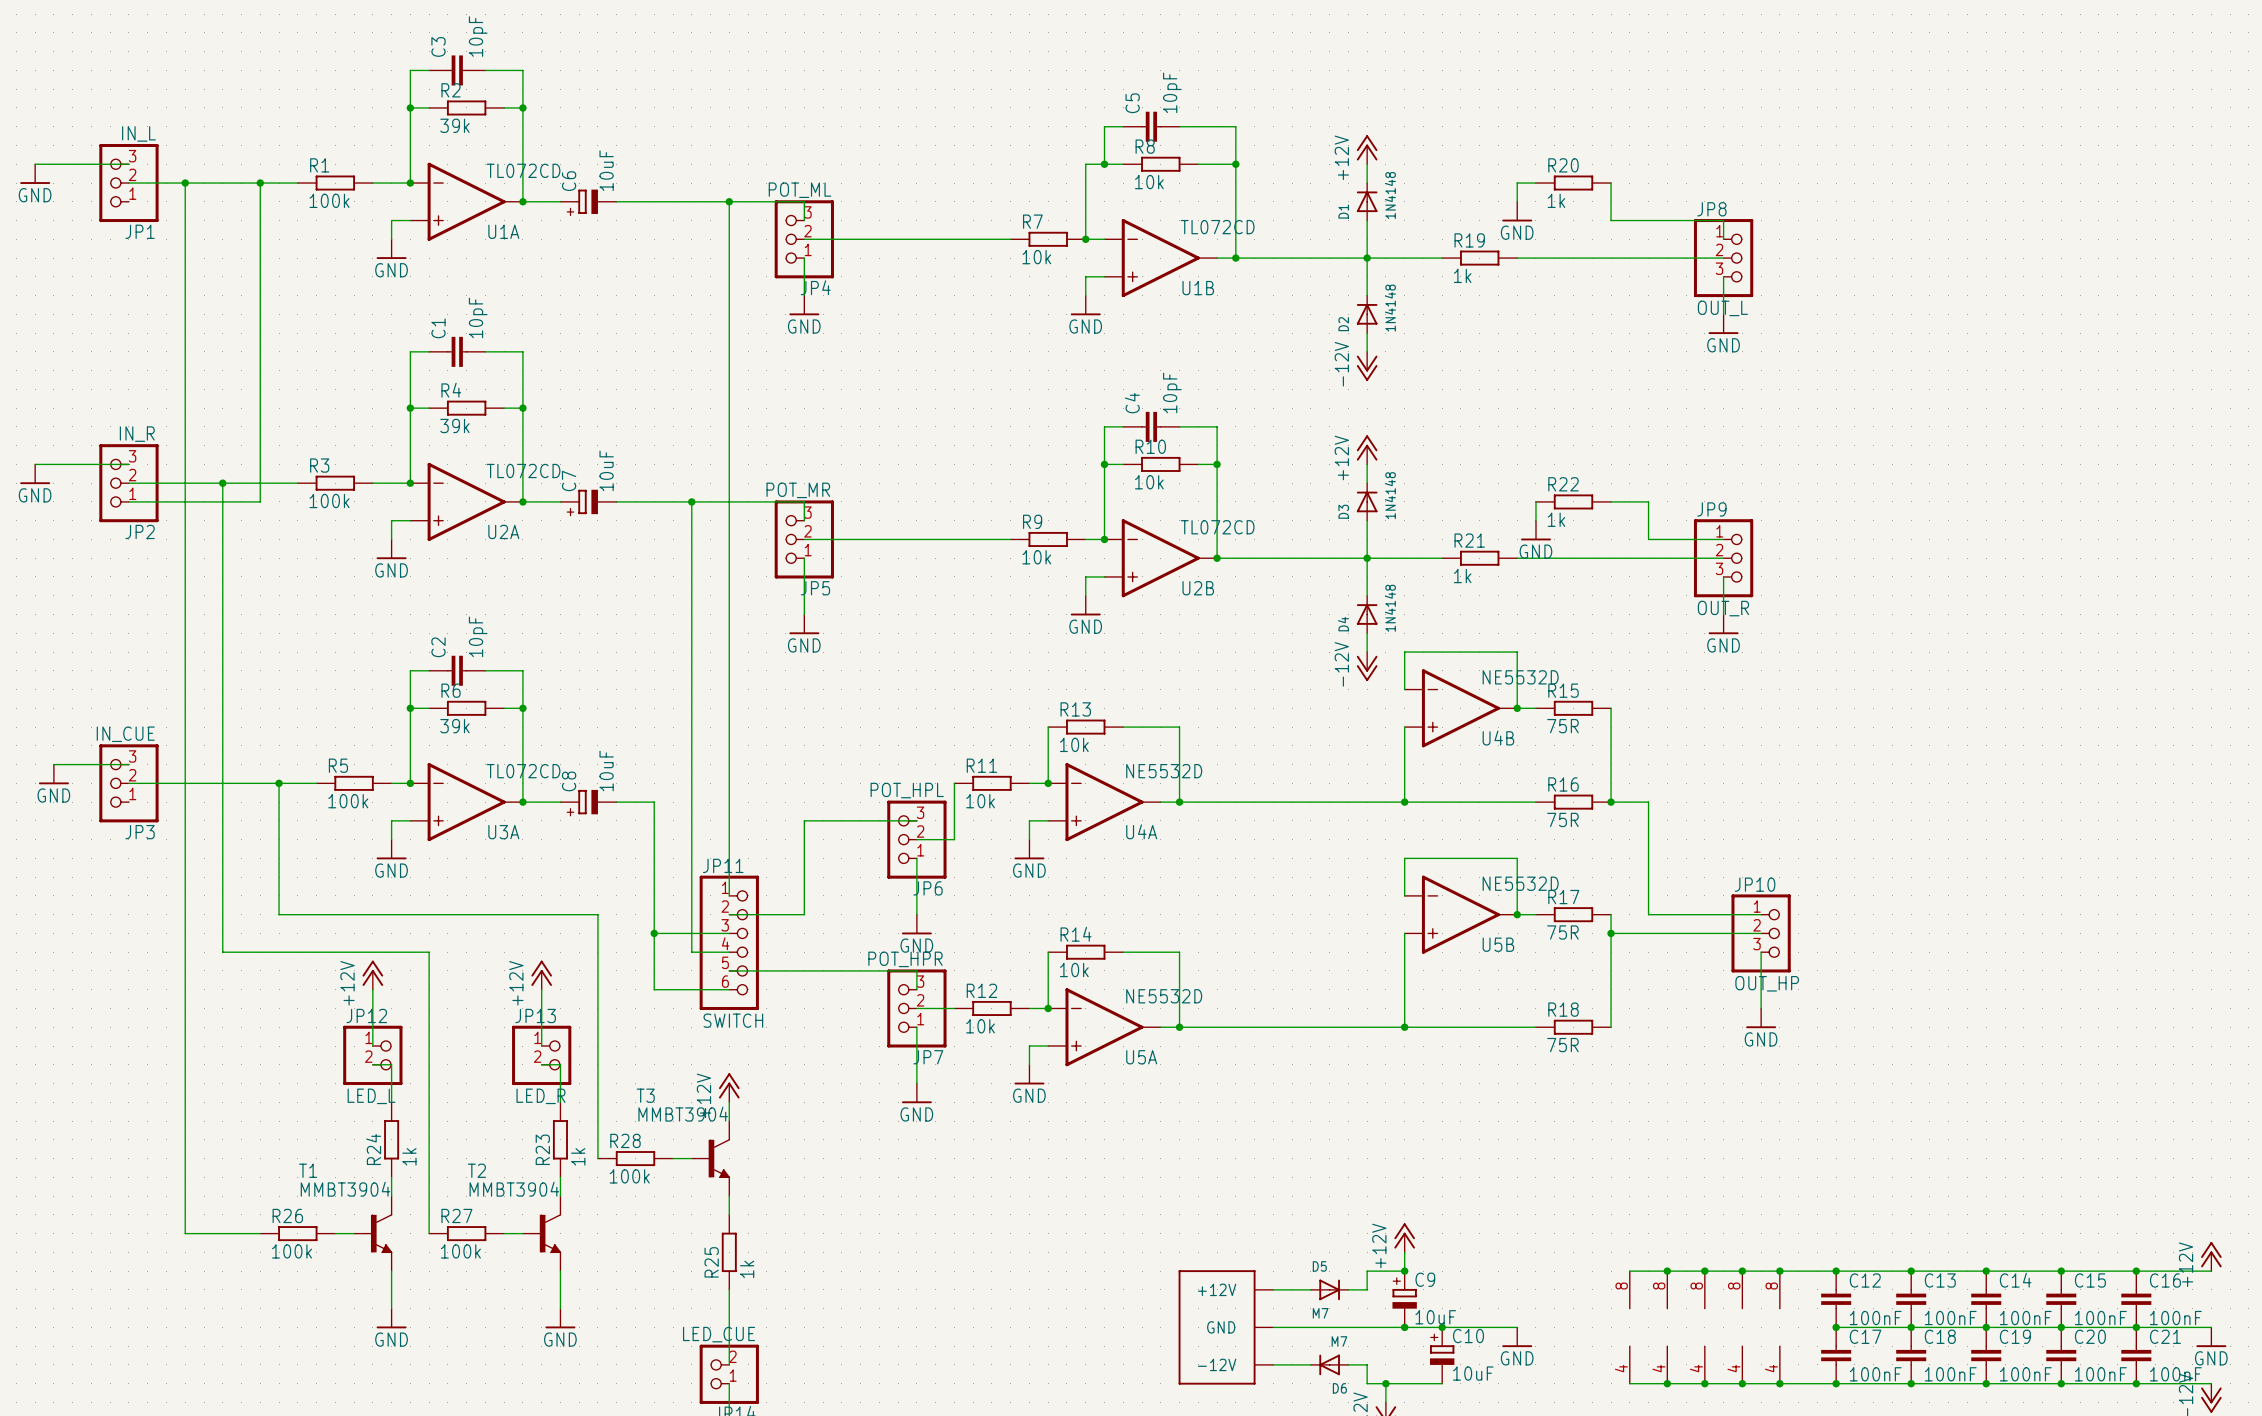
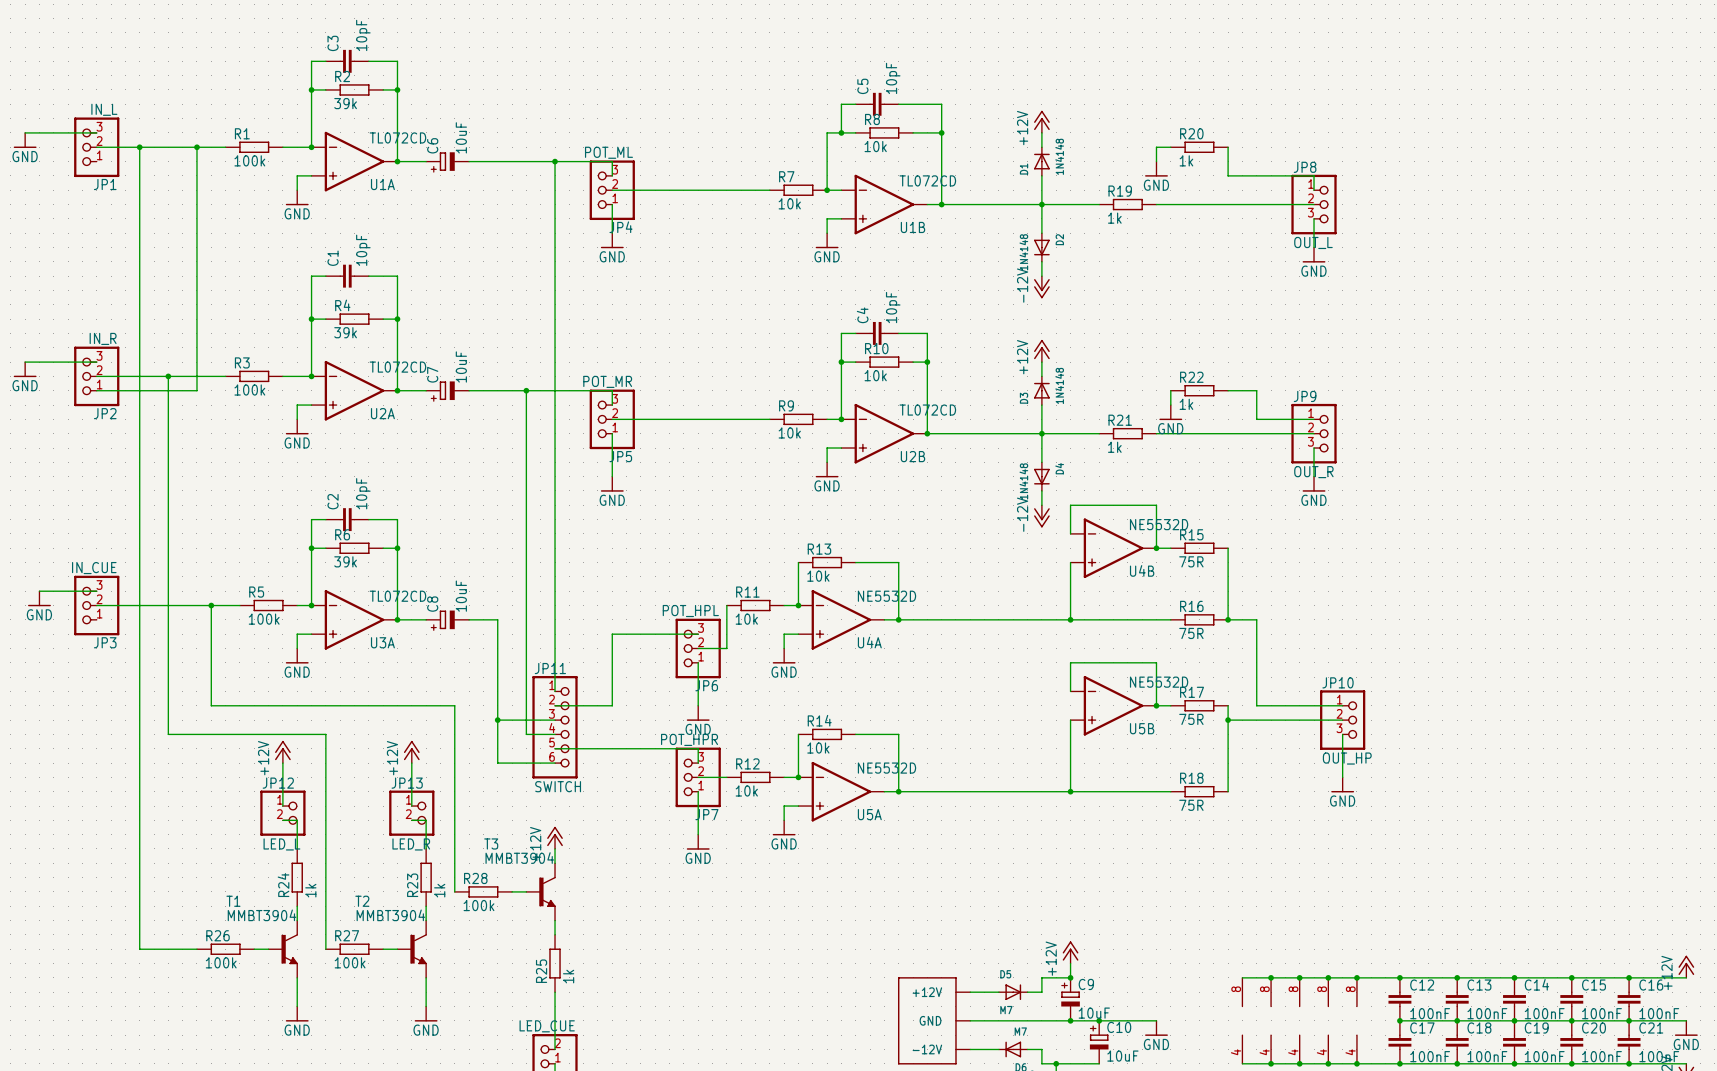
D2 rotation: 0° (1367, 314) -> 180° (1041, 247)
D4 rotation: 0° (1367, 614) -> 180° (1041, 476)

